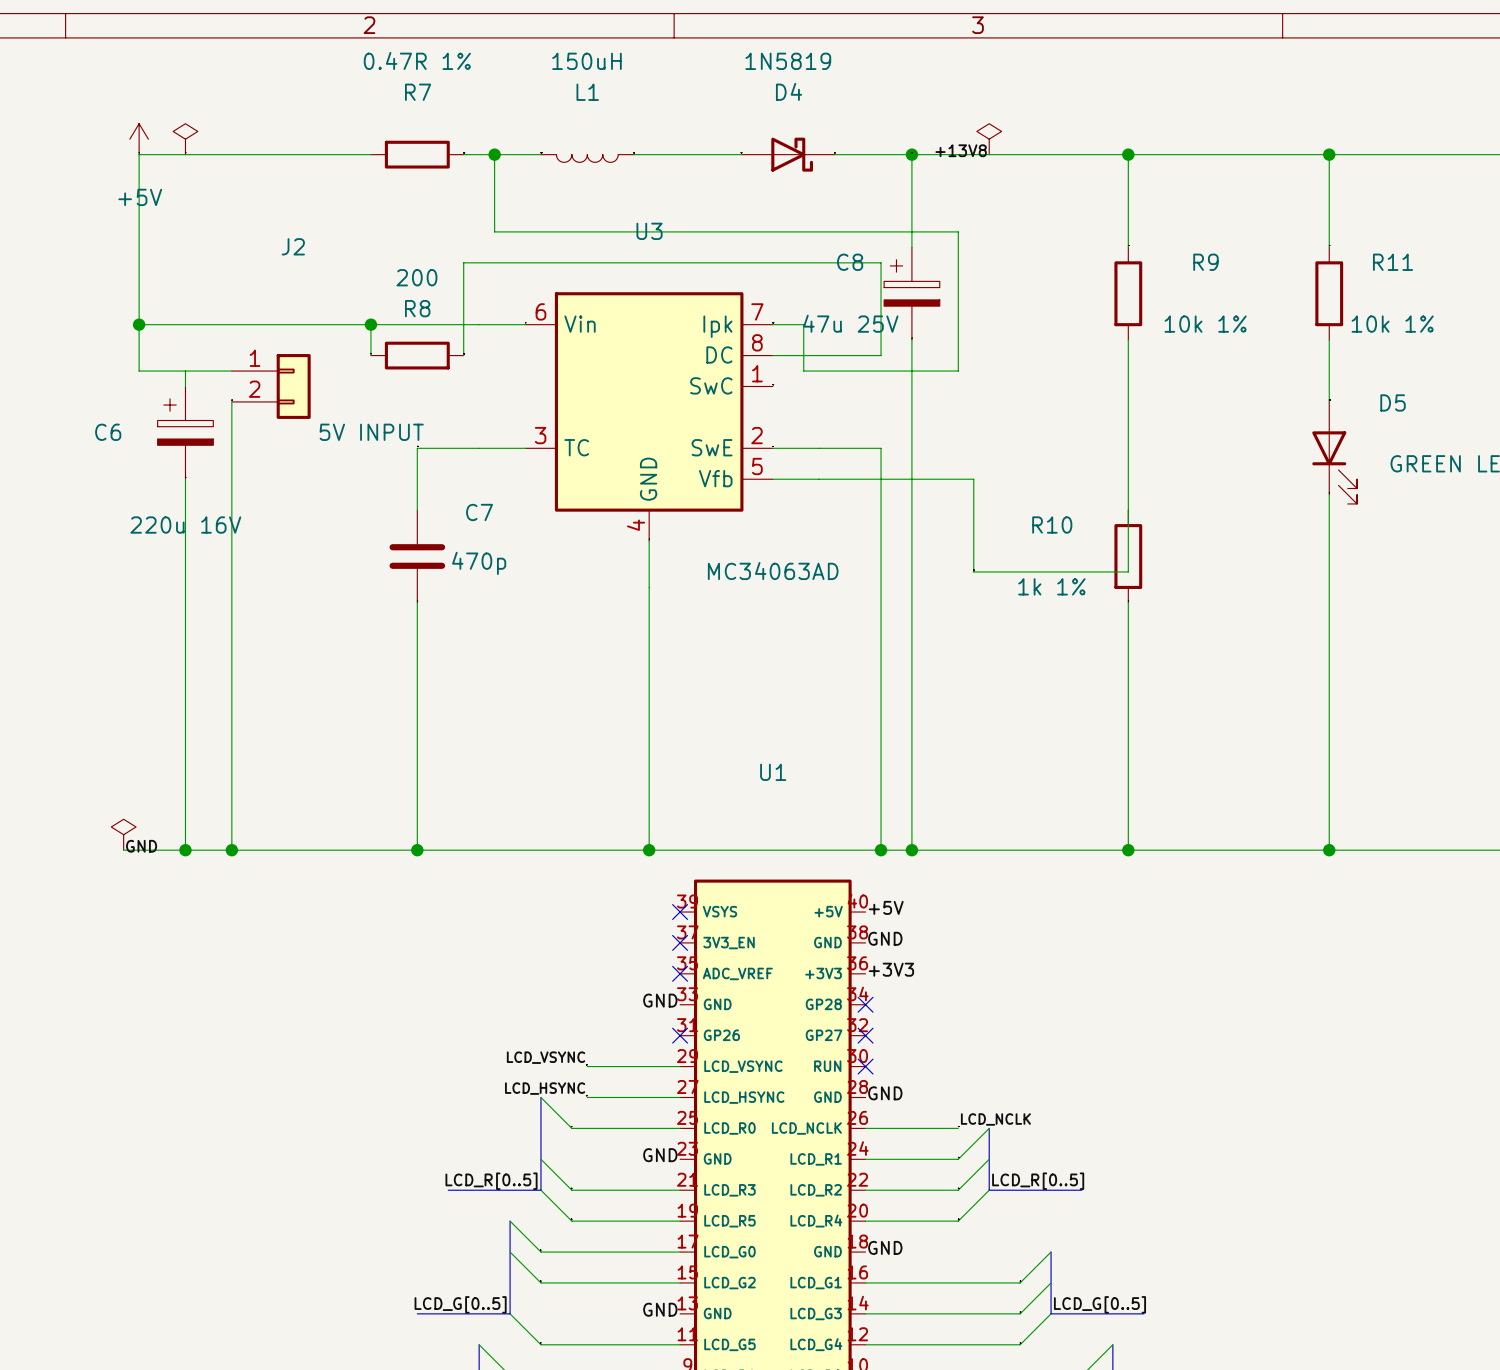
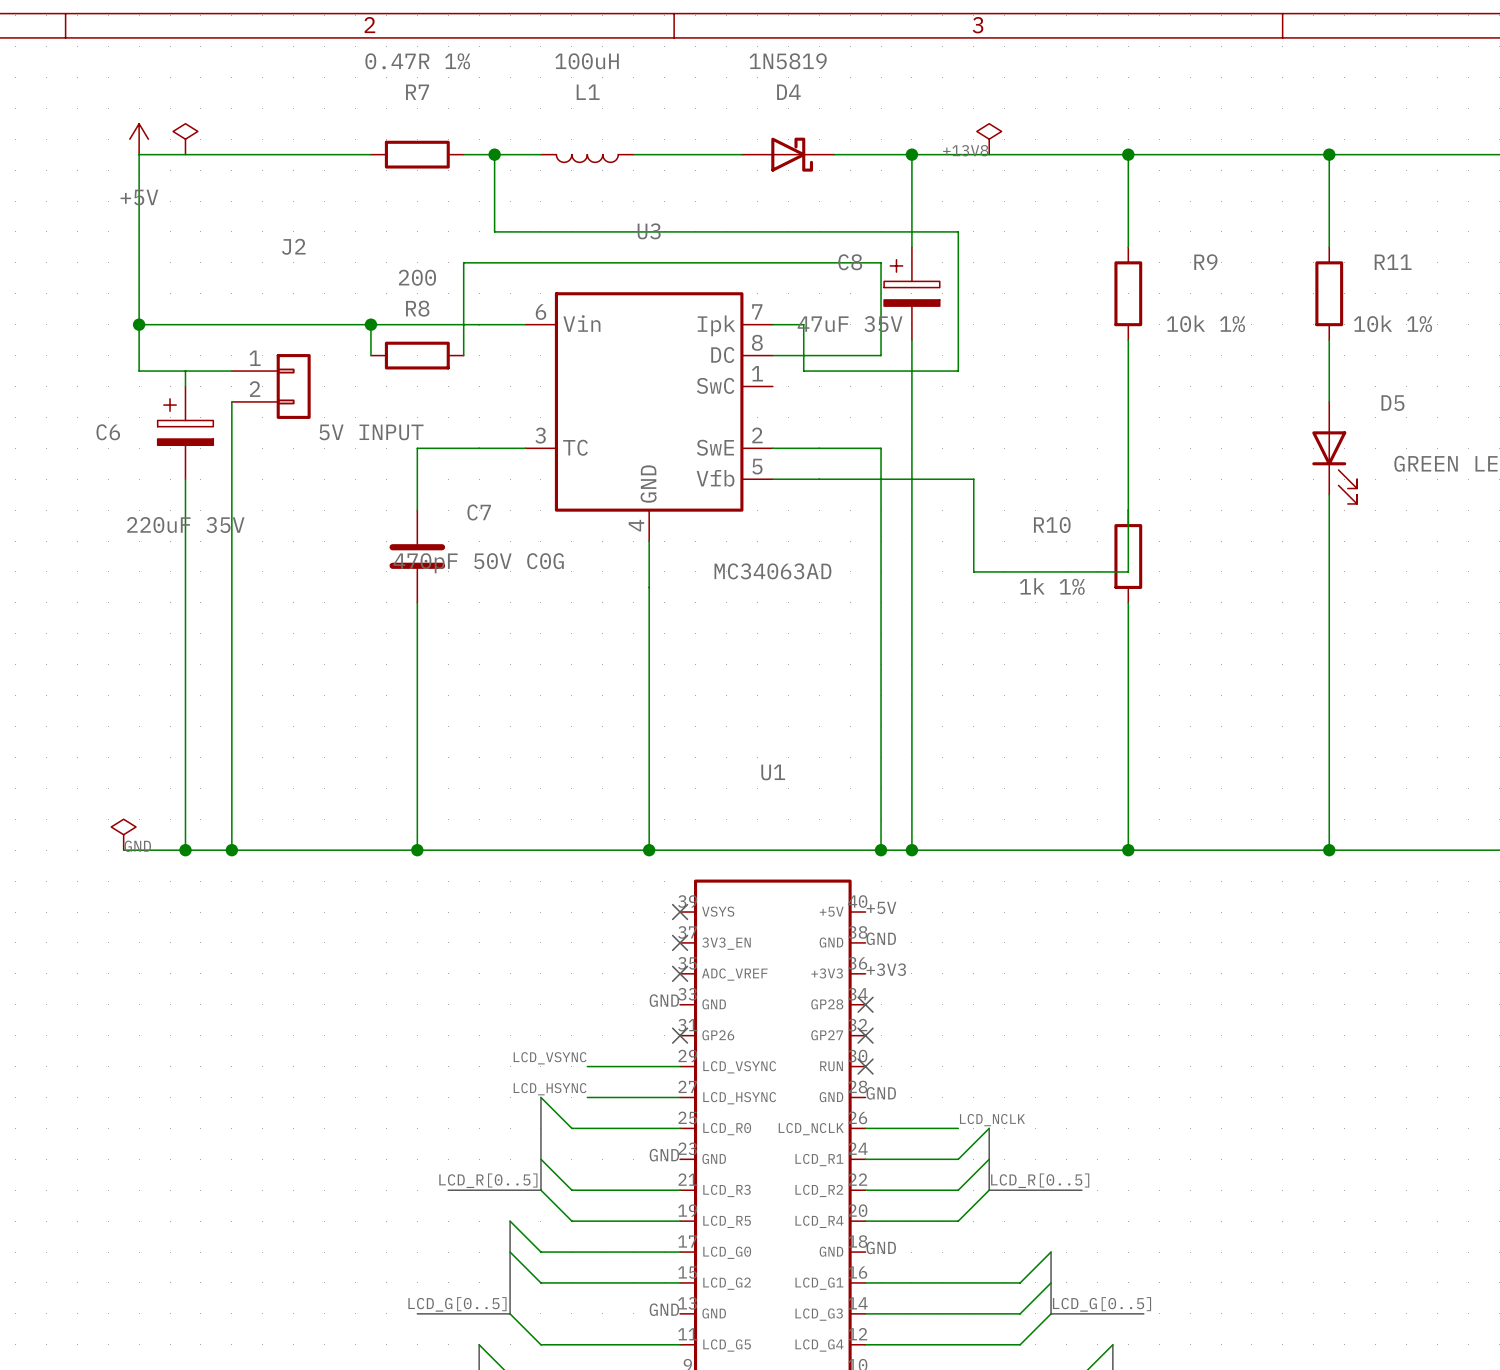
L1 value: 150uH (586, 61) -> 100uH (587, 61)
C8 value: 47u 25V (850, 323) -> 47uF 35V (850, 324)
C6 value: 220u 16V (185, 525) -> 220uF 35V (185, 525)
C7 value: 470p (479, 563) -> 470pF 50V C0G (478, 563)

